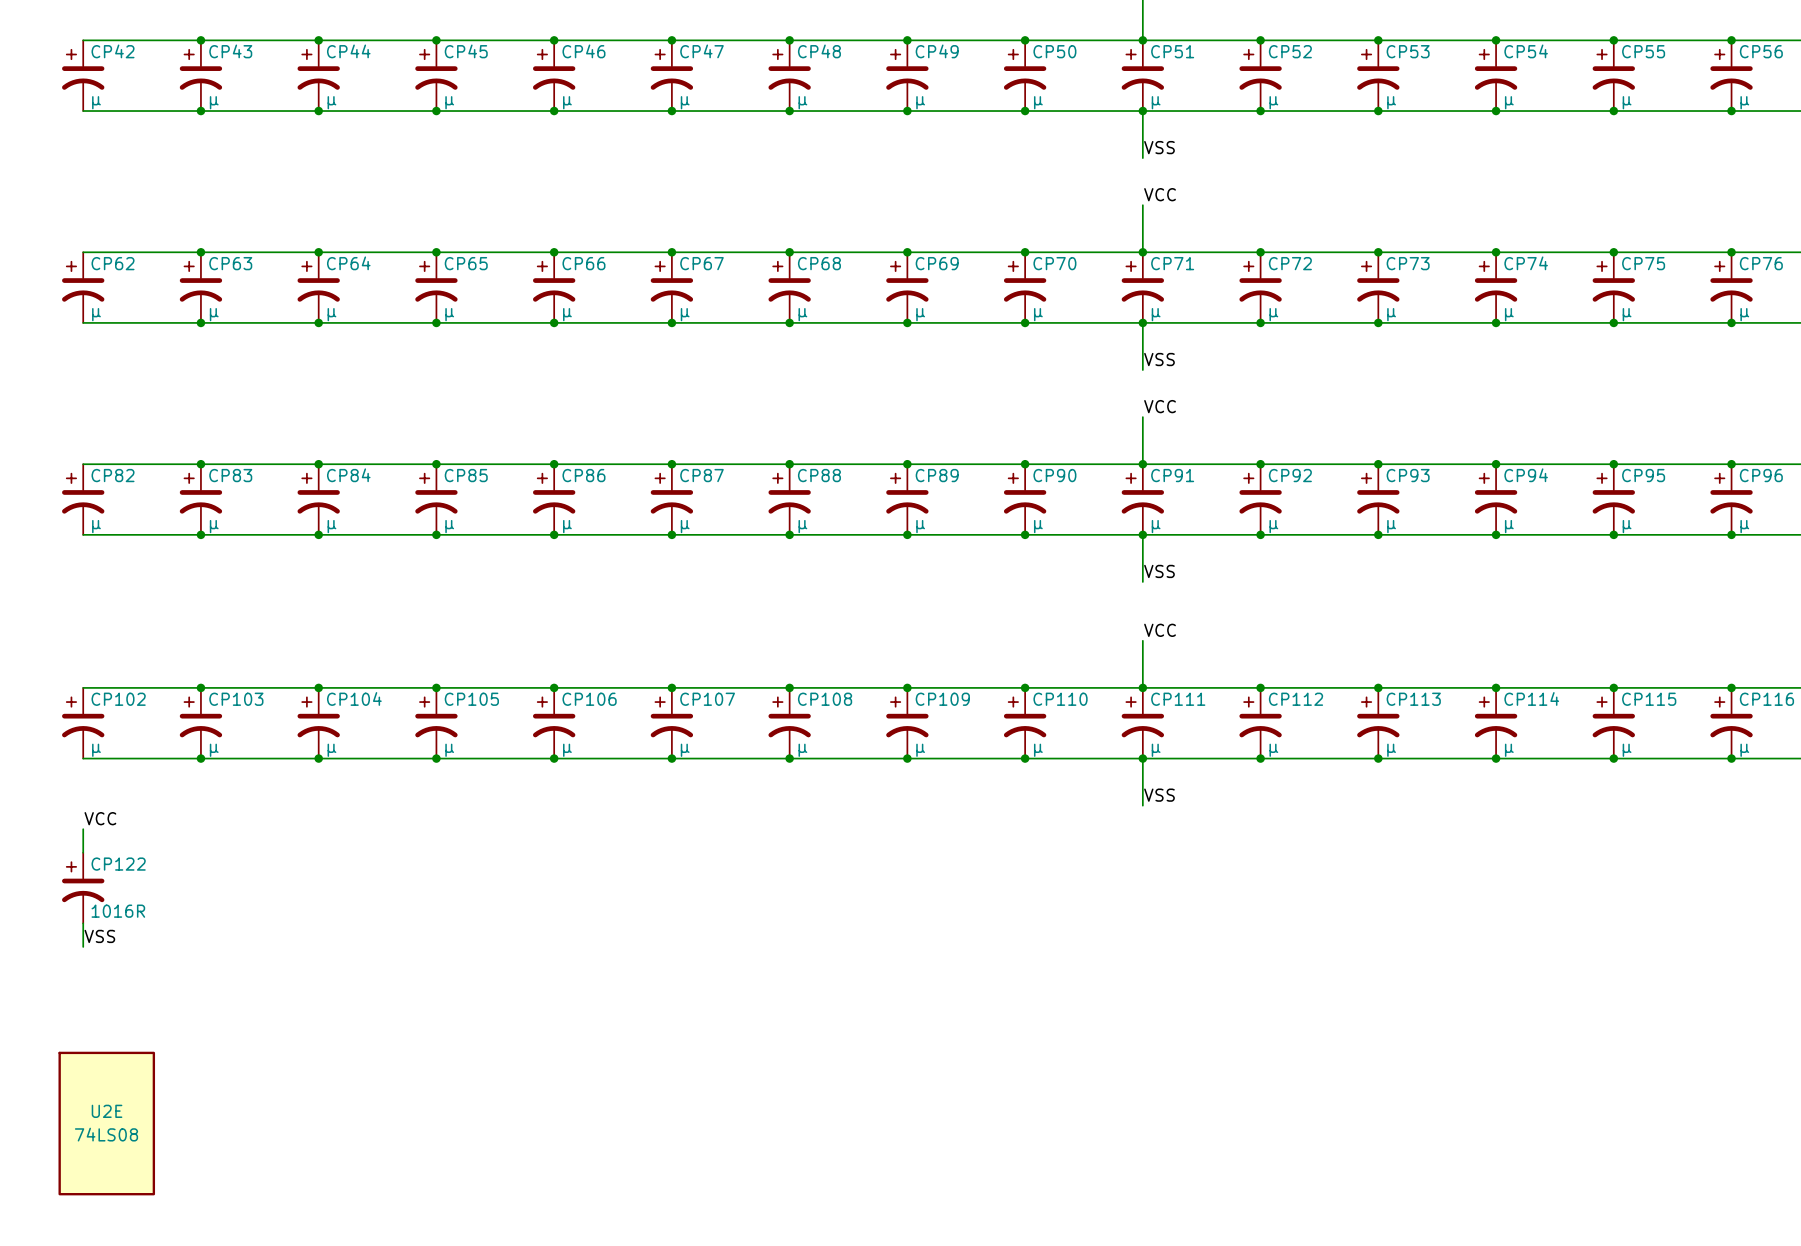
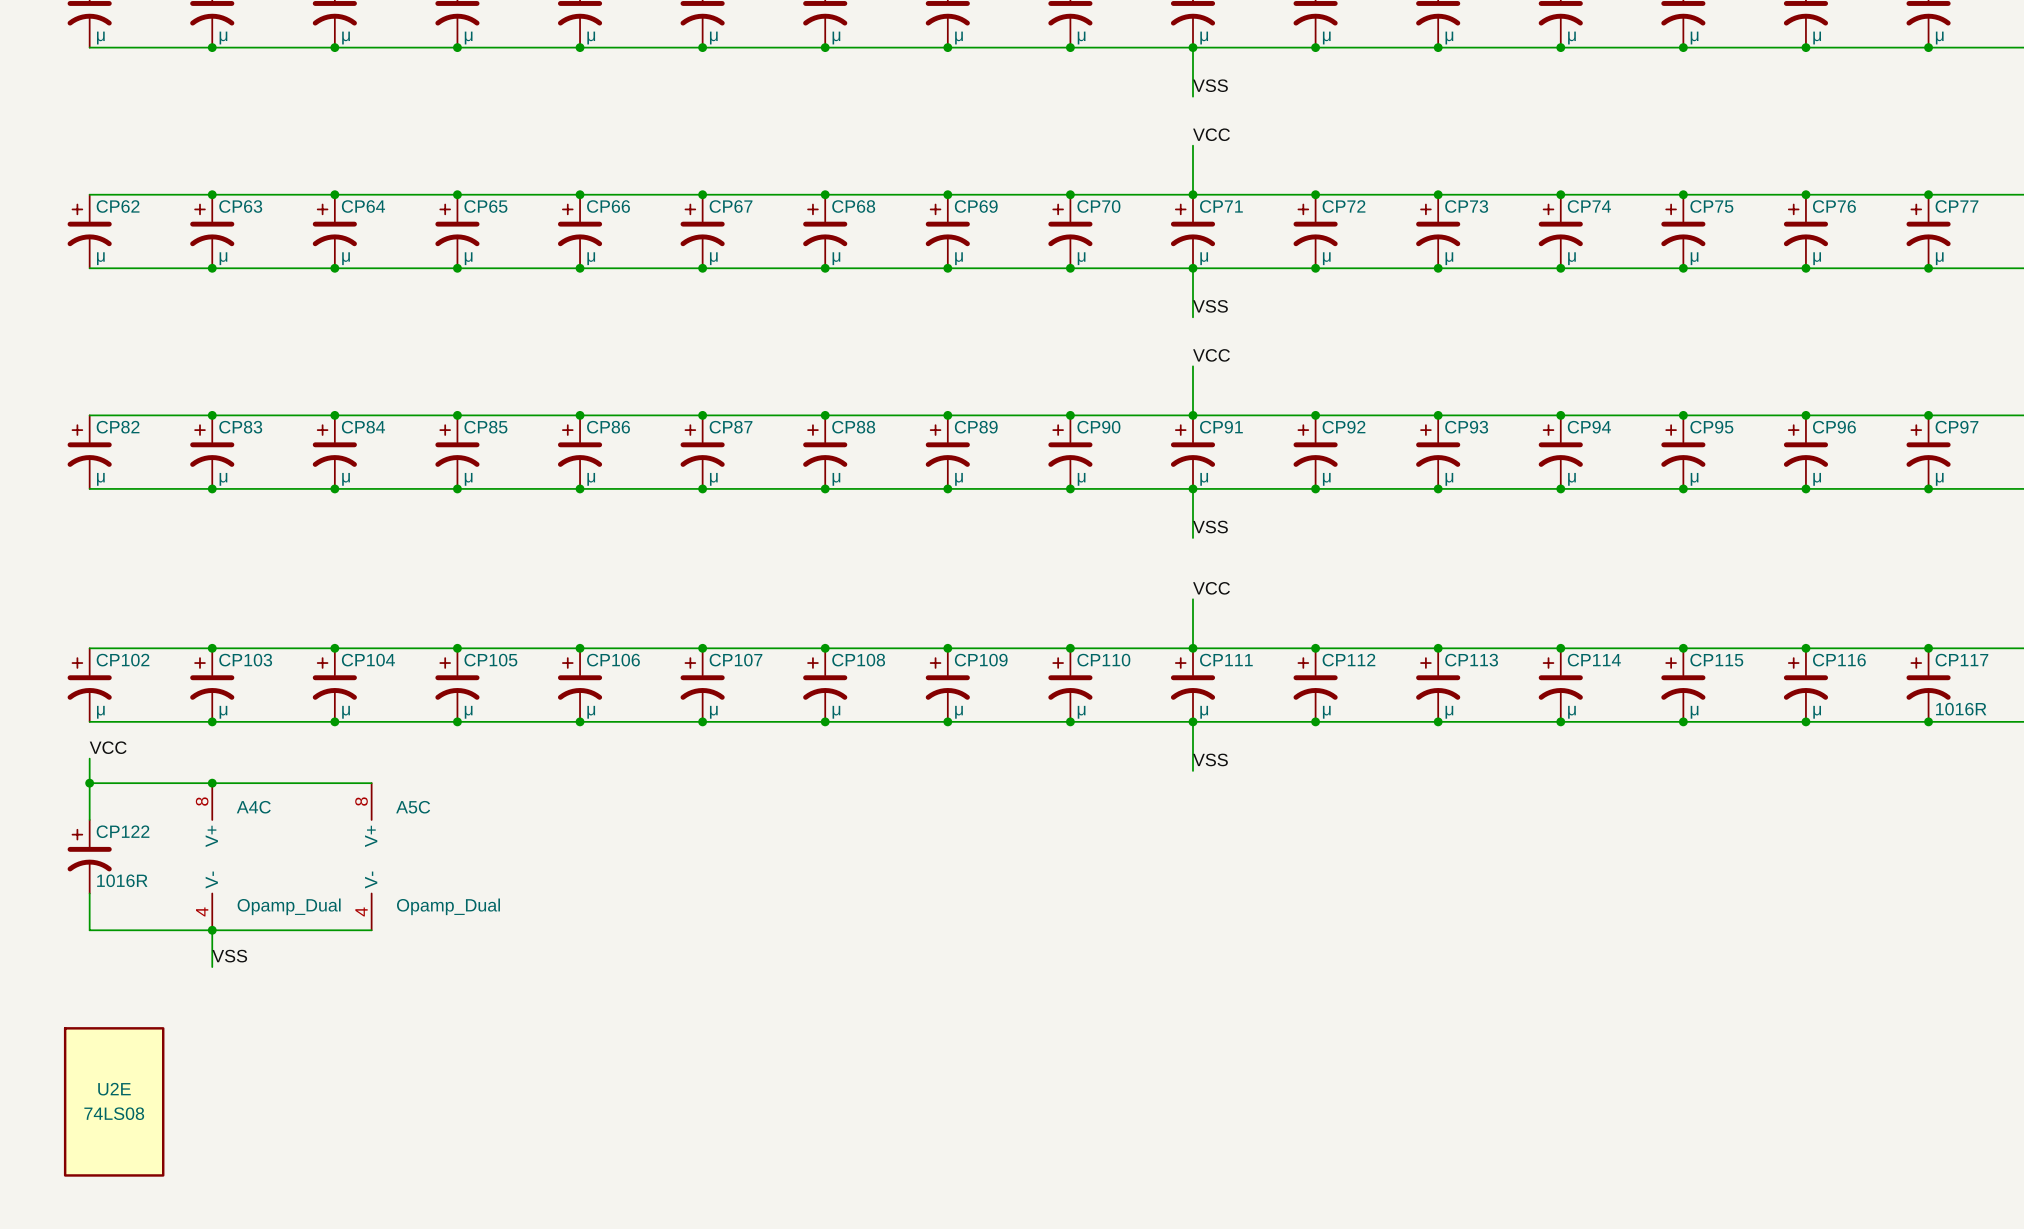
wire: none -> (89, 758) (89, 795)
wire: none -> (89, 783) (371, 783)
junction: none -> (89, 783)
junction: none -> (212, 783)
label position: VCC (100, 818) -> VCC (108, 747)
A4C: none -> Opamp_Dual (212, 856)
A5C: none -> Opamp_Dual (371, 856)
label position: VSS (99, 936) -> VSS (229, 956)
wire: none -> (89, 918) (89, 930) (371, 930)
wire: none -> (212, 930) (212, 967)
junction: none -> (212, 930)

